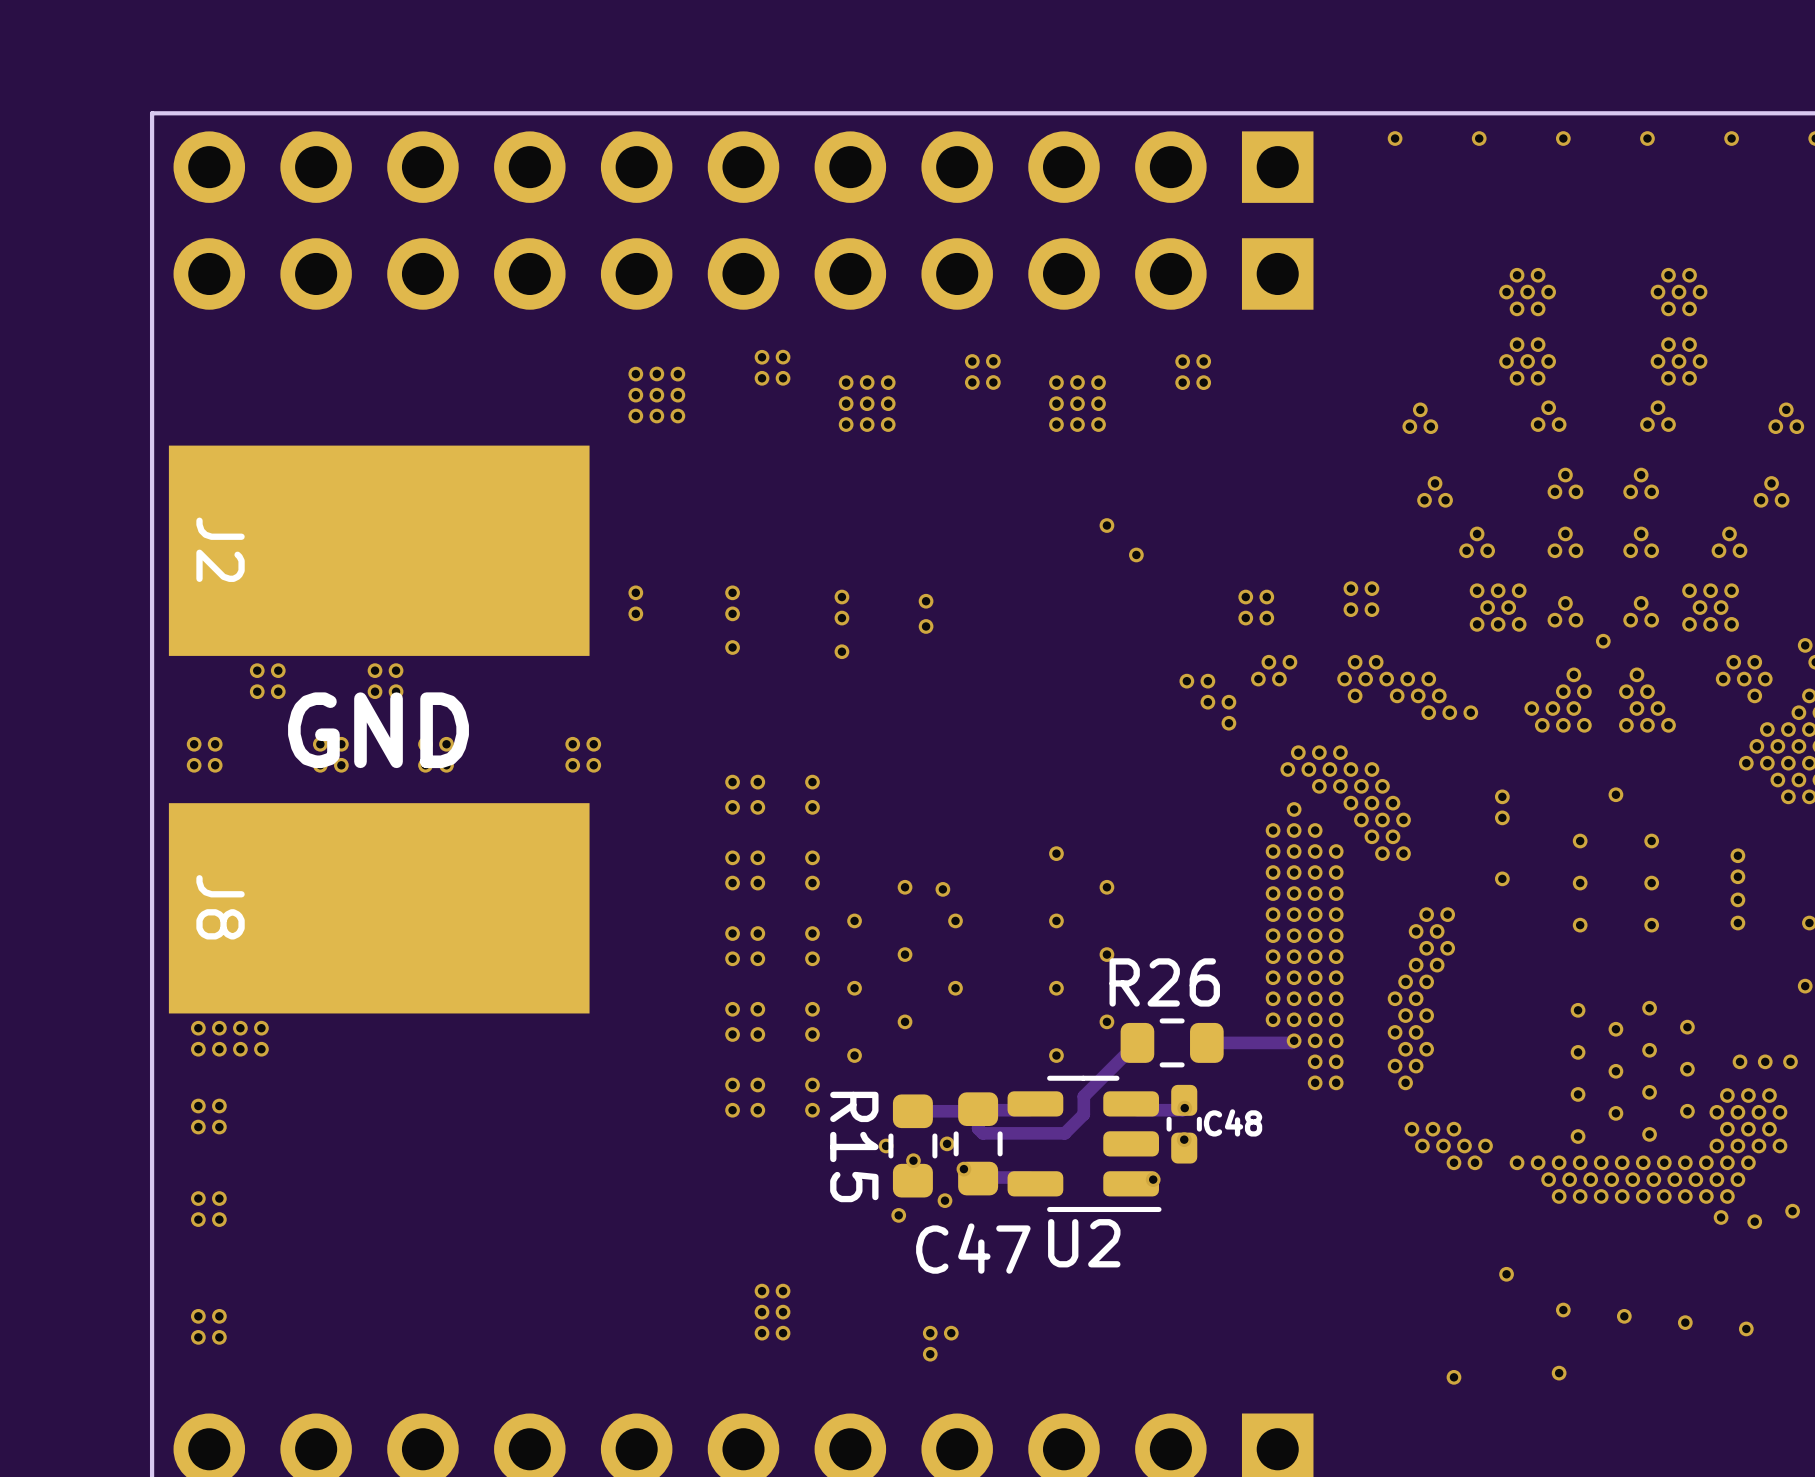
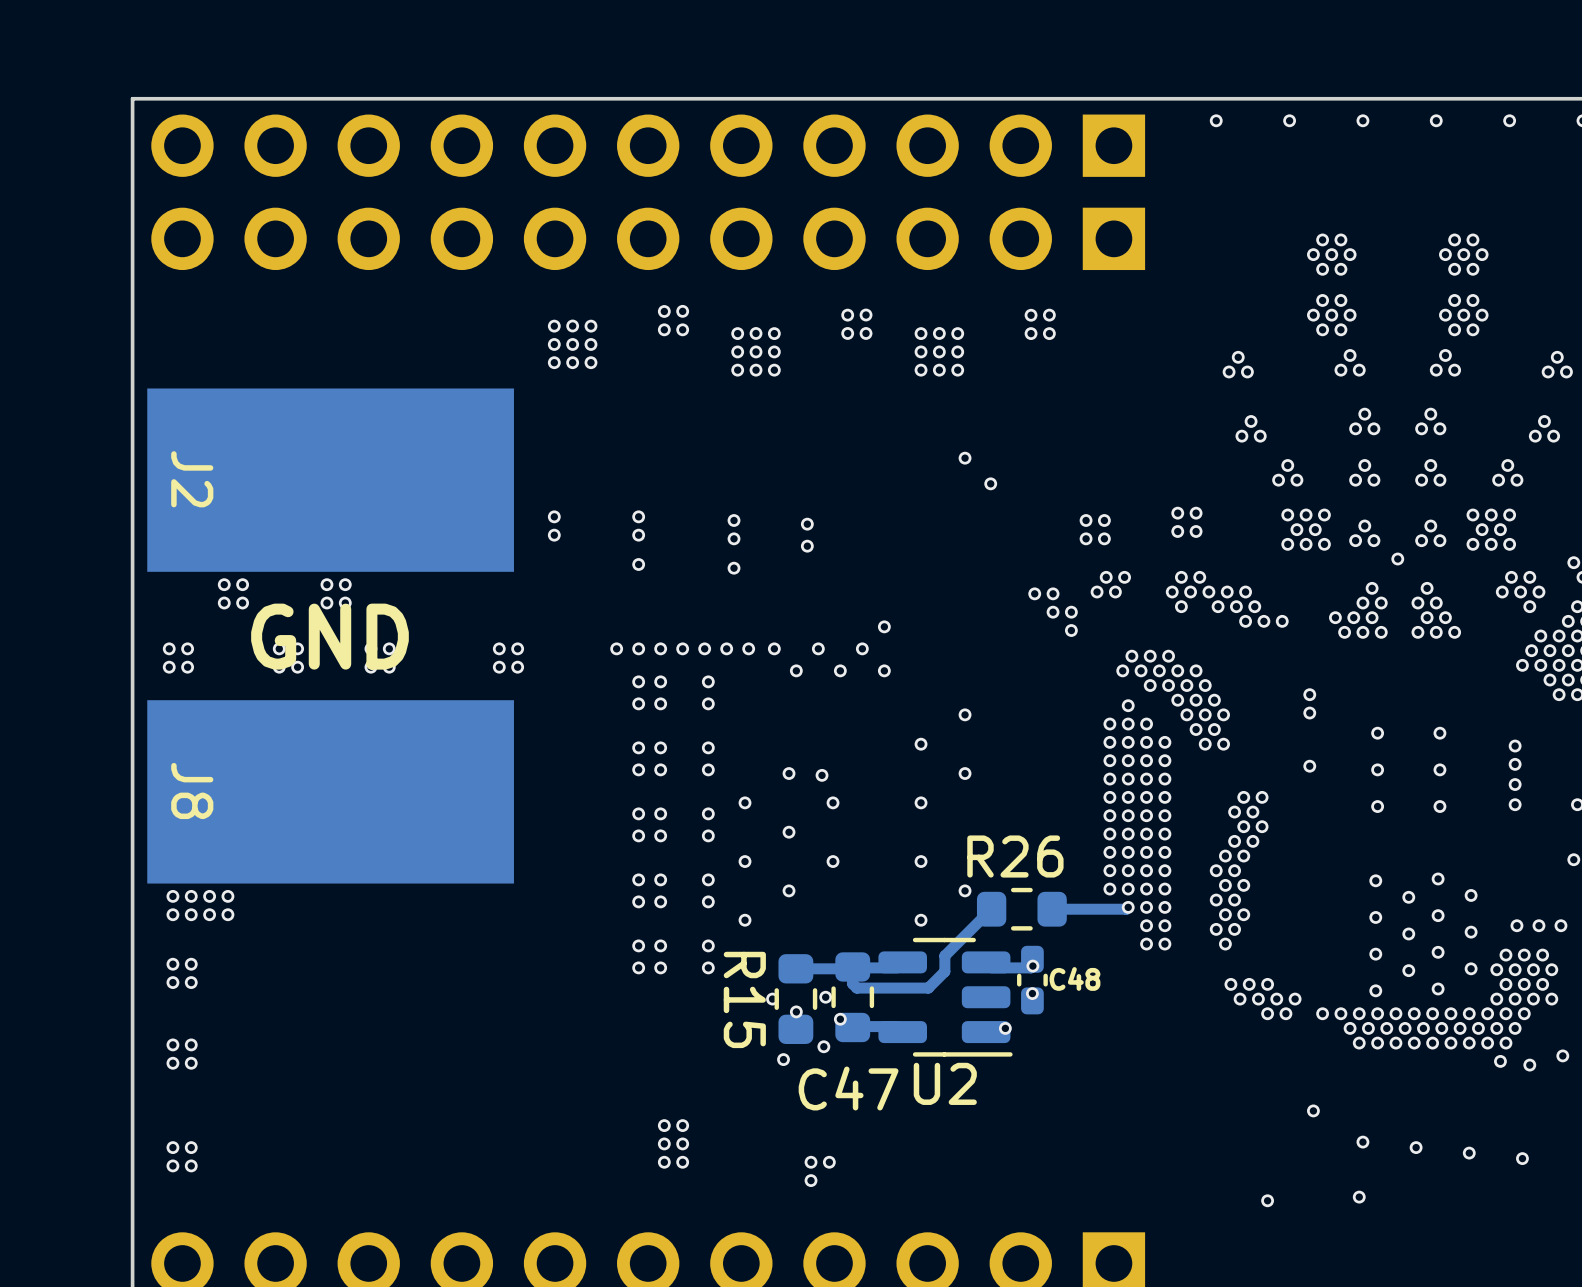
via: none -> (884, 626)
via: none -> (616, 648)
via: none -> (638, 648)
via: none -> (660, 648)
via: none -> (682, 648)
via: none -> (704, 648)
via: none -> (726, 648)
via: none -> (748, 648)
via: none -> (774, 648)
via: none -> (818, 648)
via: none -> (862, 648)
via: none -> (796, 670)
via: none -> (840, 670)
via: none -> (884, 670)
via: (1615, 794) -> none
via: none -> (965, 714)
via: (1106, 954) -> none

